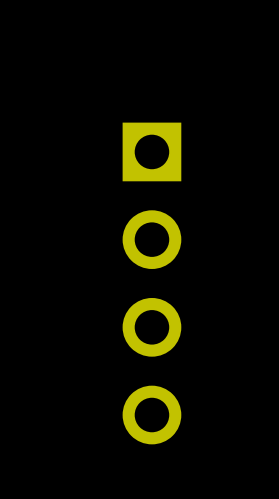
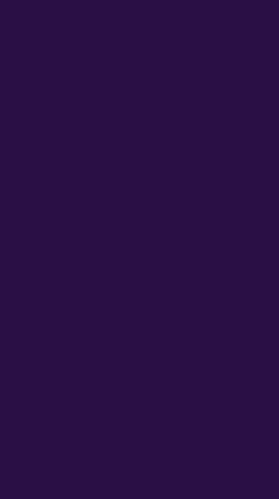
part: (151, 283) -> none

